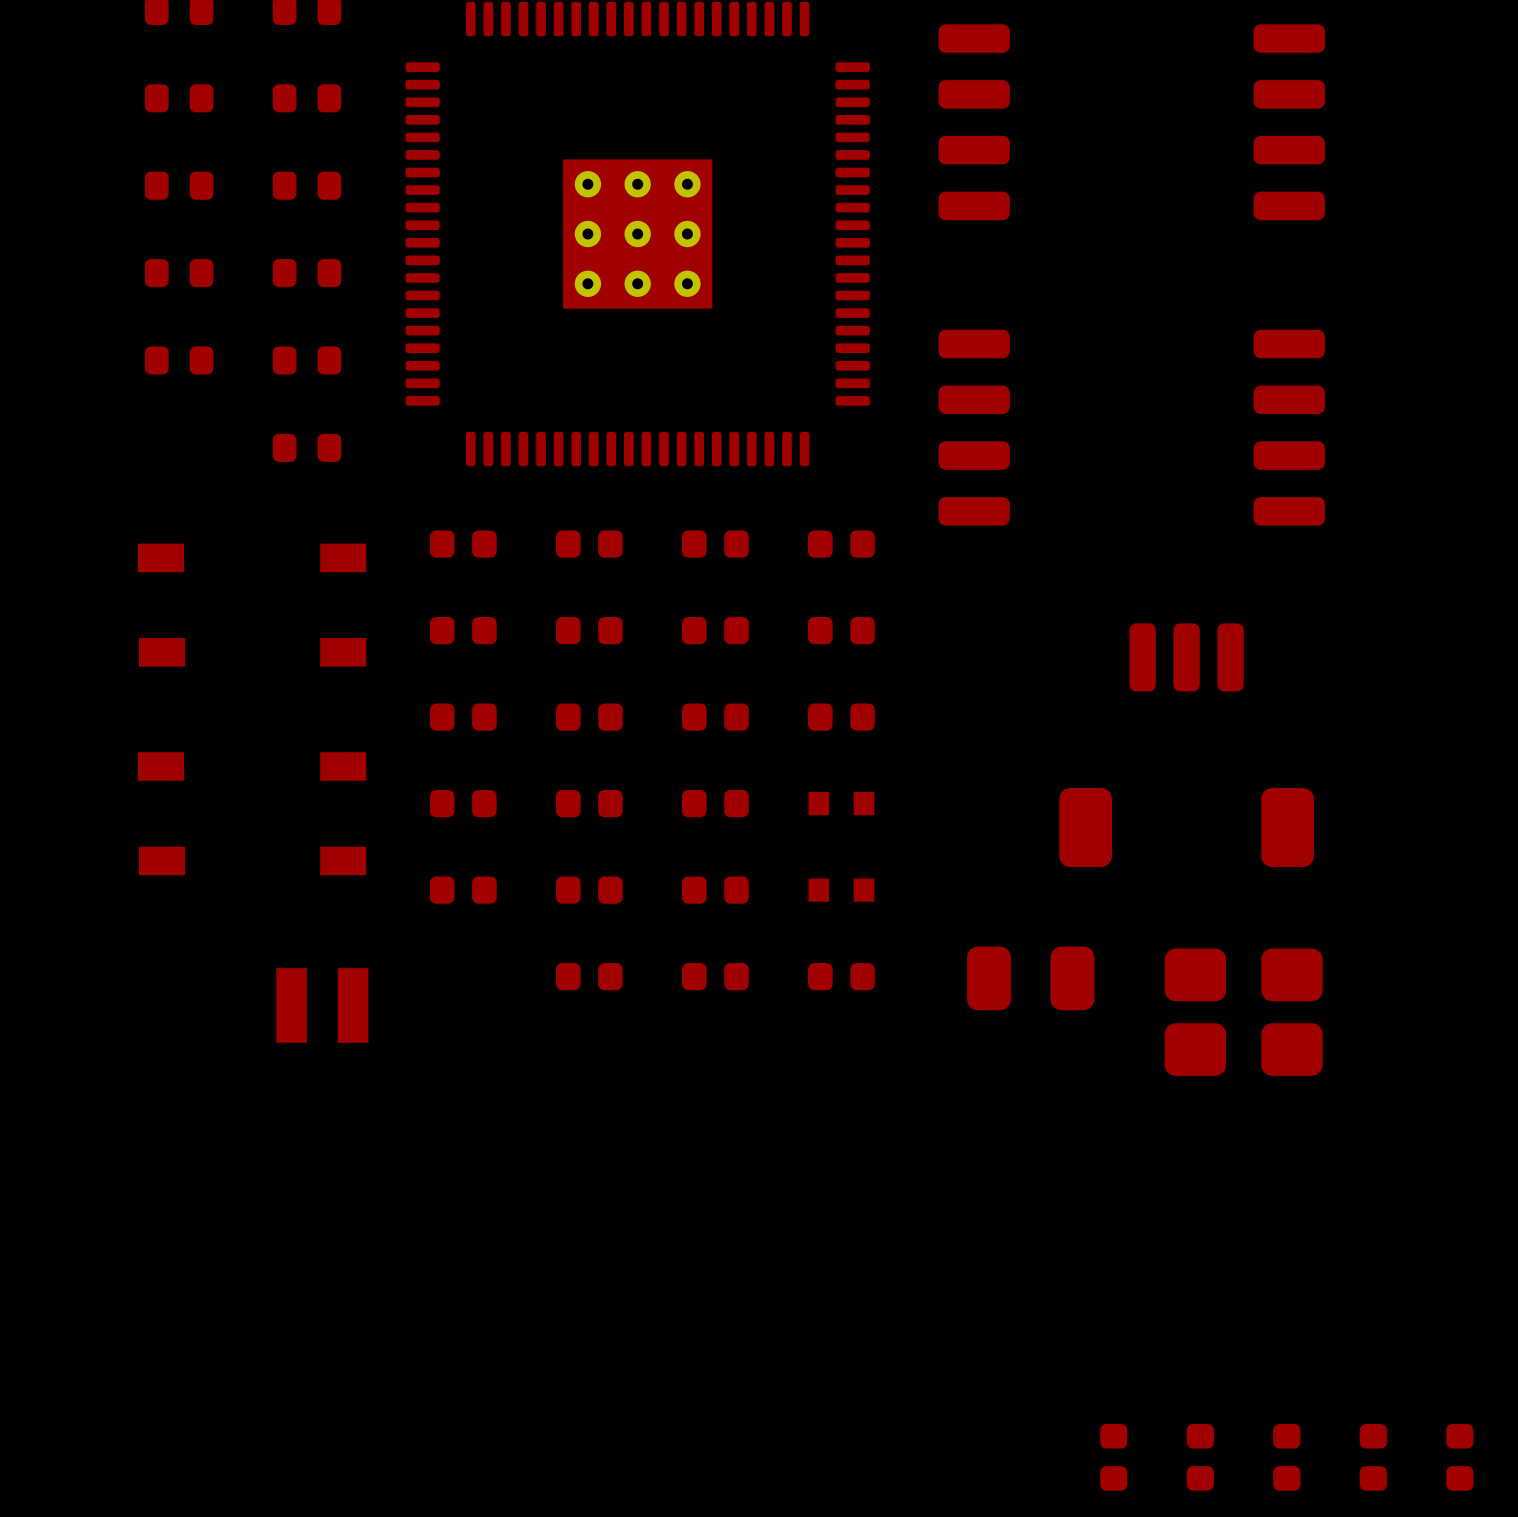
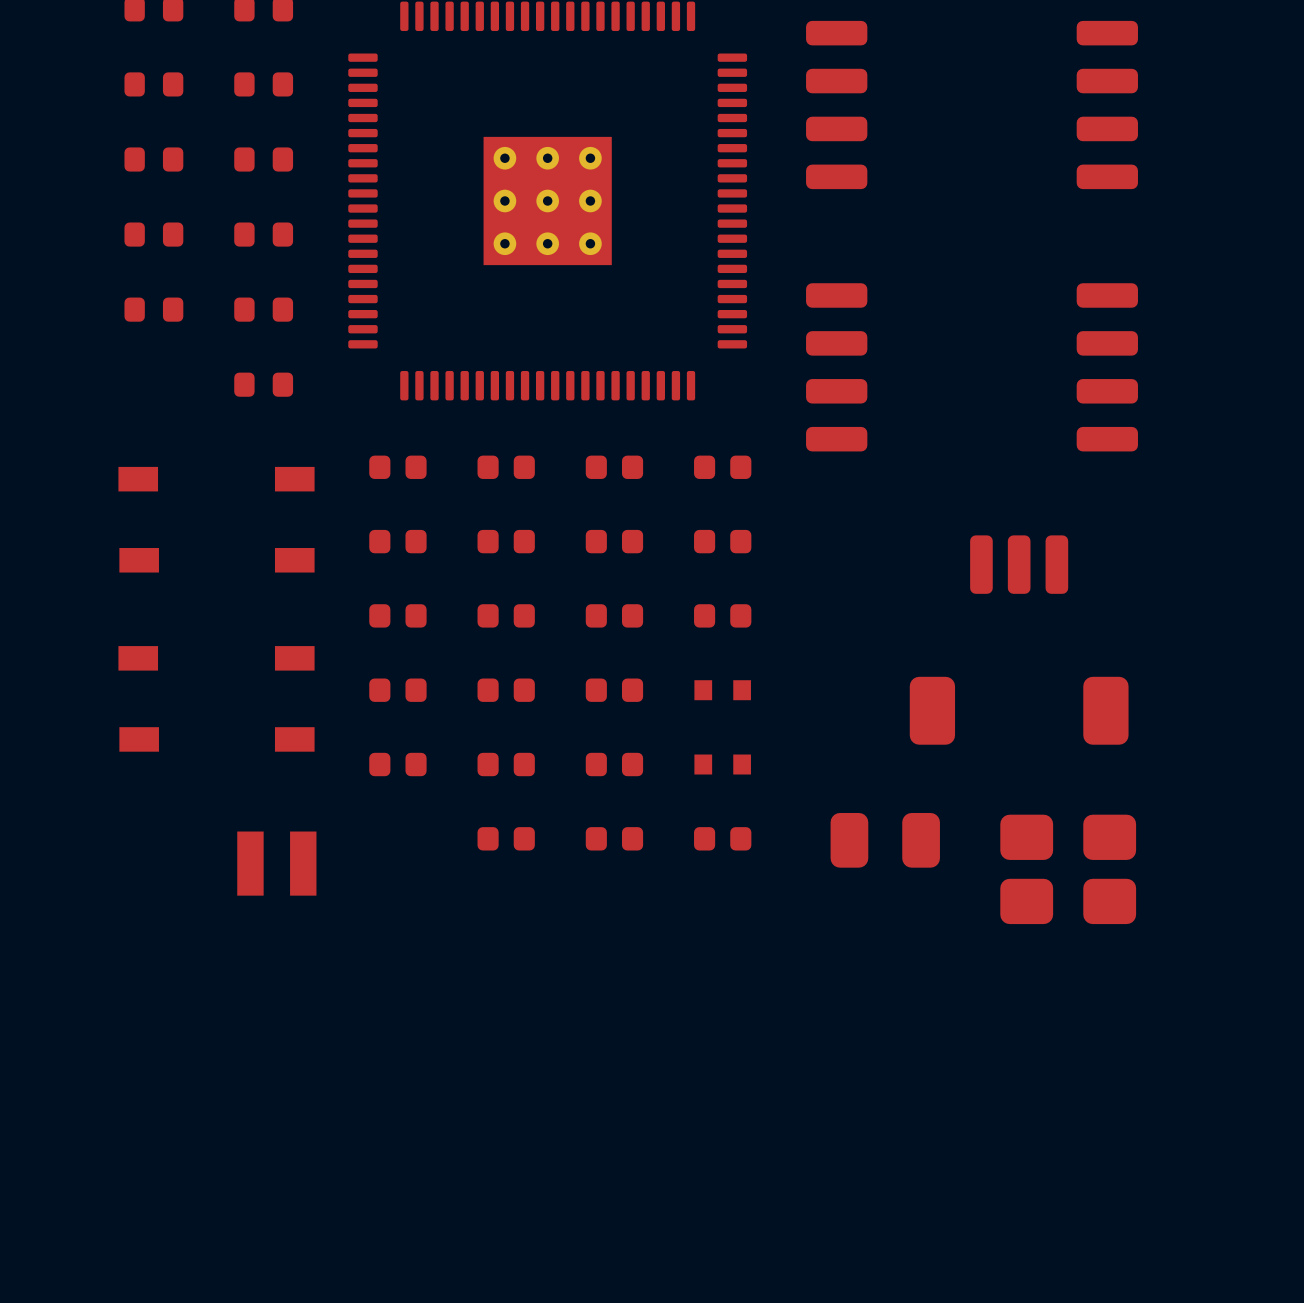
part: (1113, 1457) -> none
part: (1200, 1457) -> none
part: (1286, 1457) -> none
part: (1373, 1457) -> none
part: (1459, 1457) -> none

